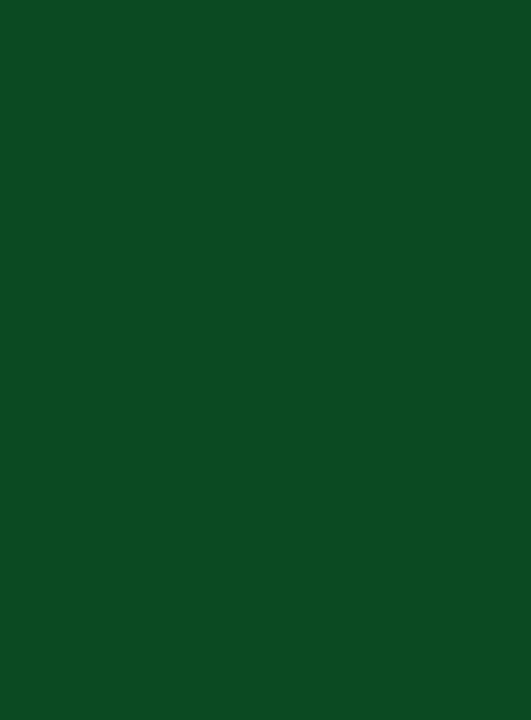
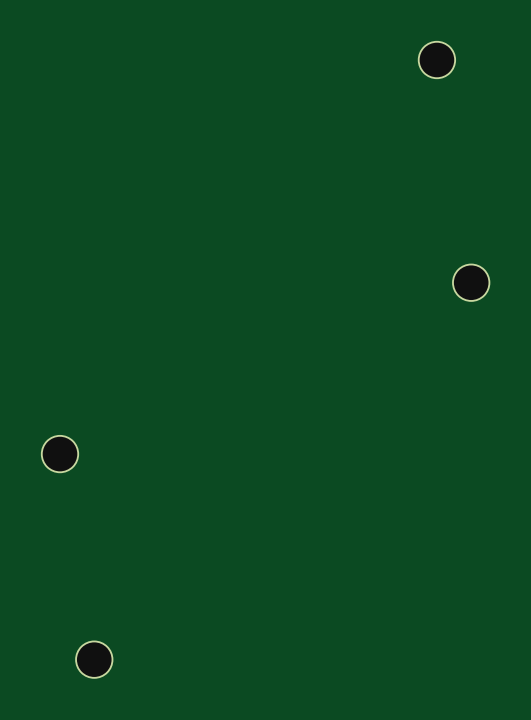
part: none -> (436, 59)
part: none -> (471, 282)
part: none -> (59, 454)
part: none -> (94, 659)

